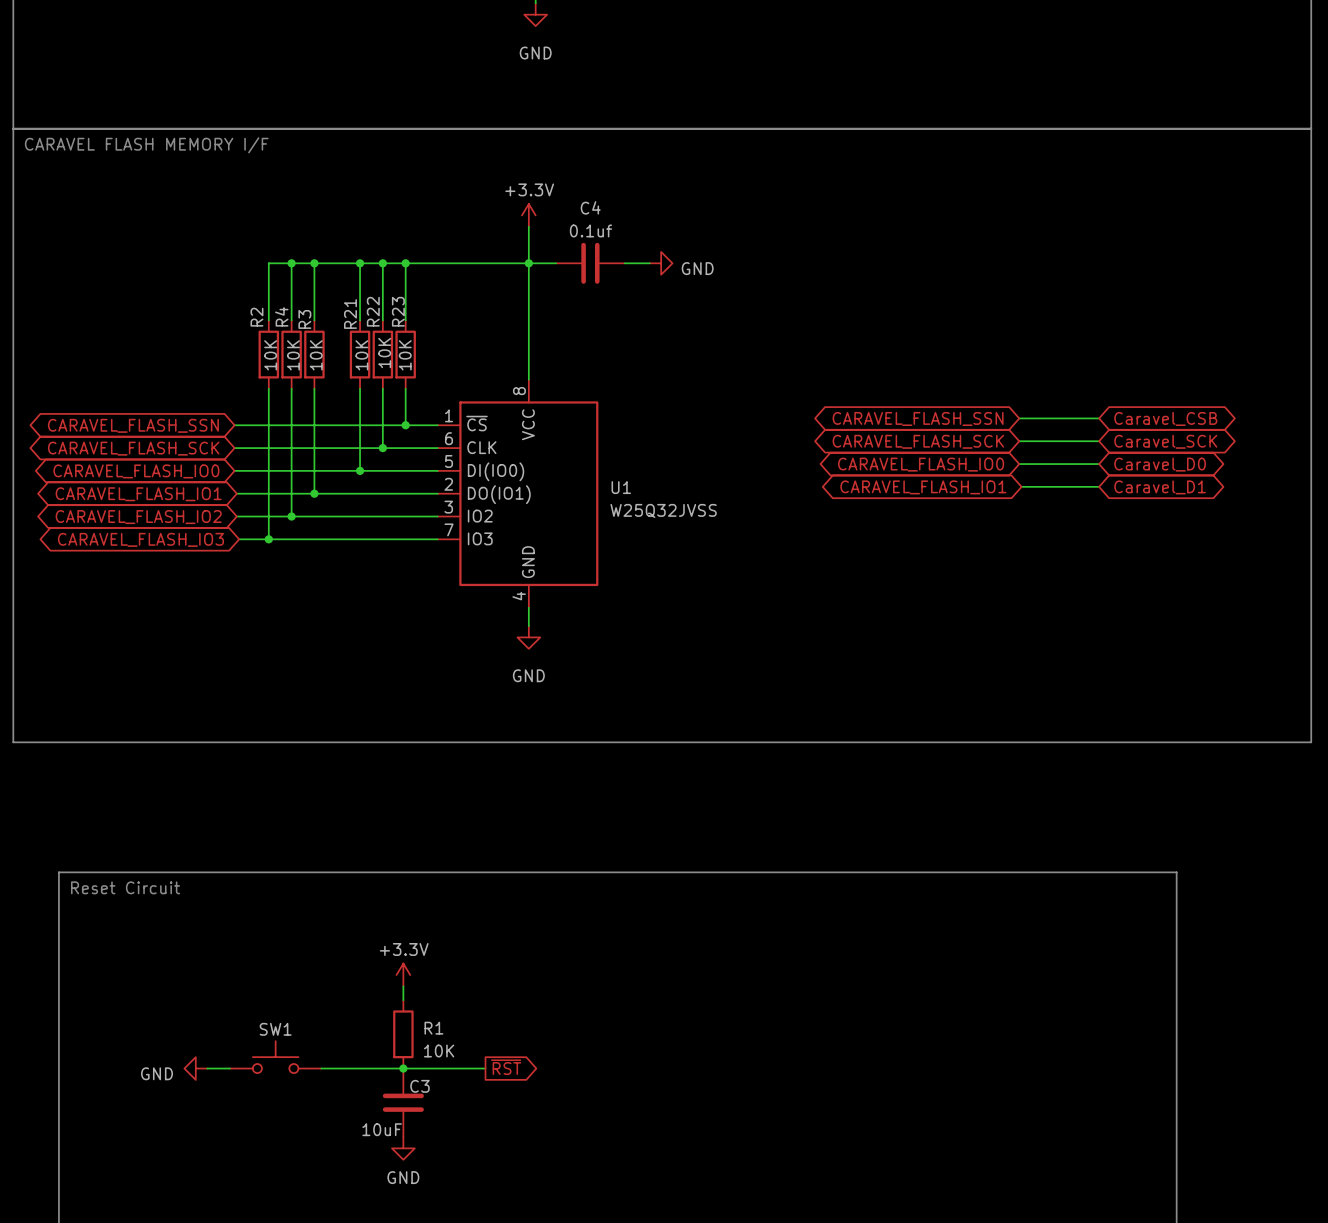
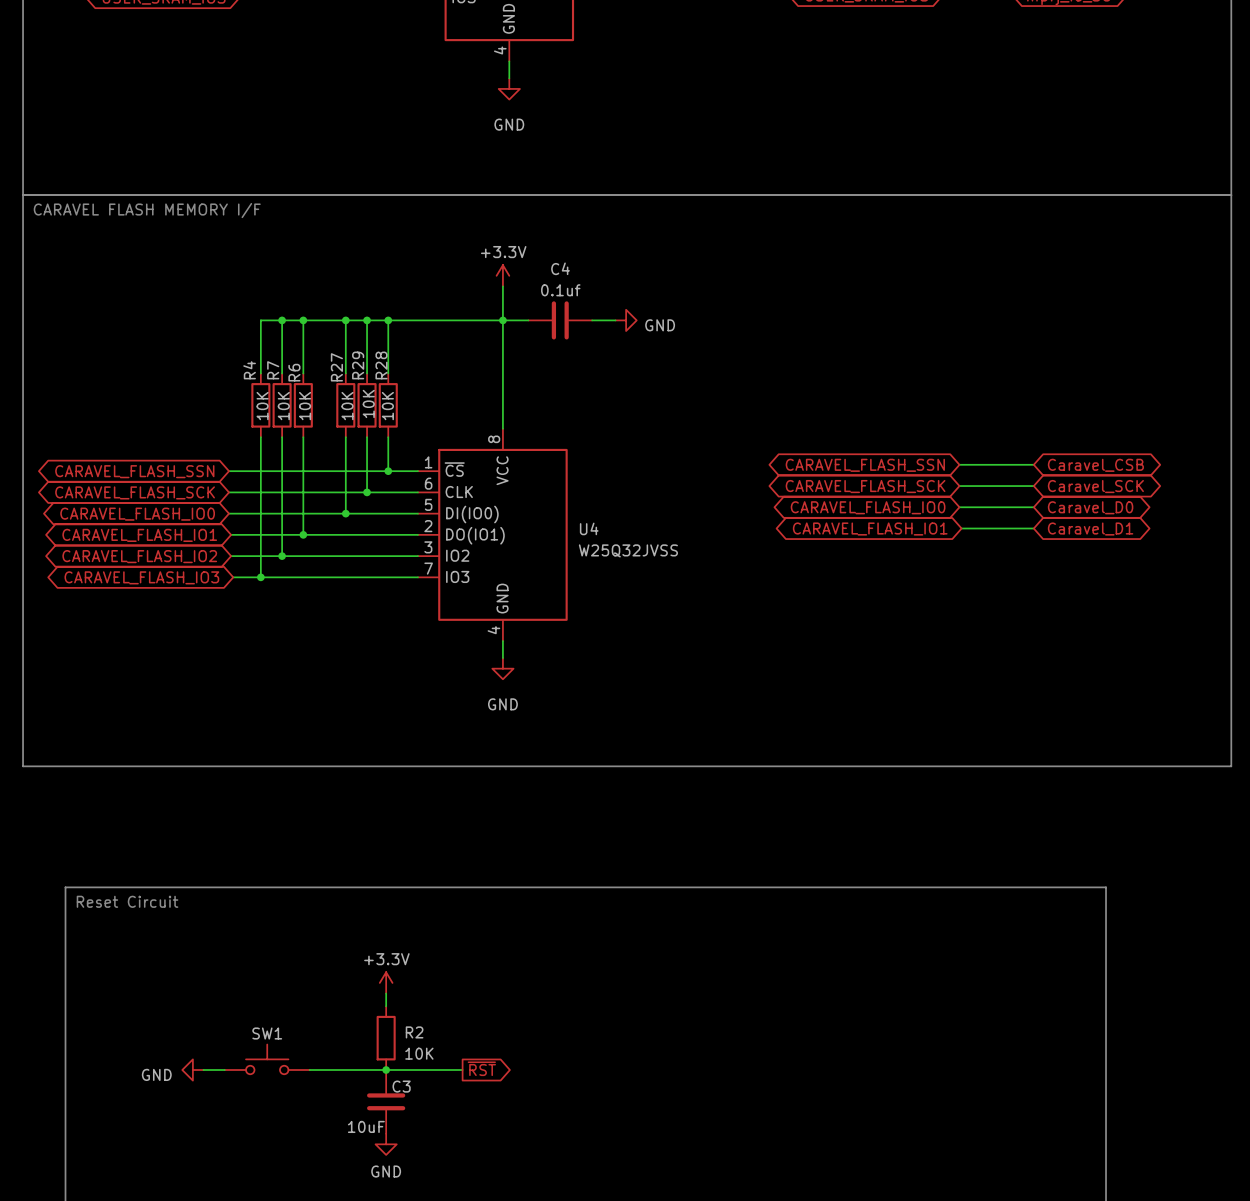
R22 name: R22 (373, 311) -> R29 (358, 365)
R23 name: R23 (398, 311) -> R28 (381, 365)
R21 name: R21 (350, 314) -> R27 (336, 367)
R4 name: R4 (281, 316) -> R7 (273, 370)
R2 name: R2 (256, 317) -> R4 (249, 370)
R3 name: R3 (304, 319) -> R6 (294, 372)
U1 name: U1 (621, 487) -> U4 (589, 528)
R1 name: R1 (433, 1028) -> R2 (414, 1032)

